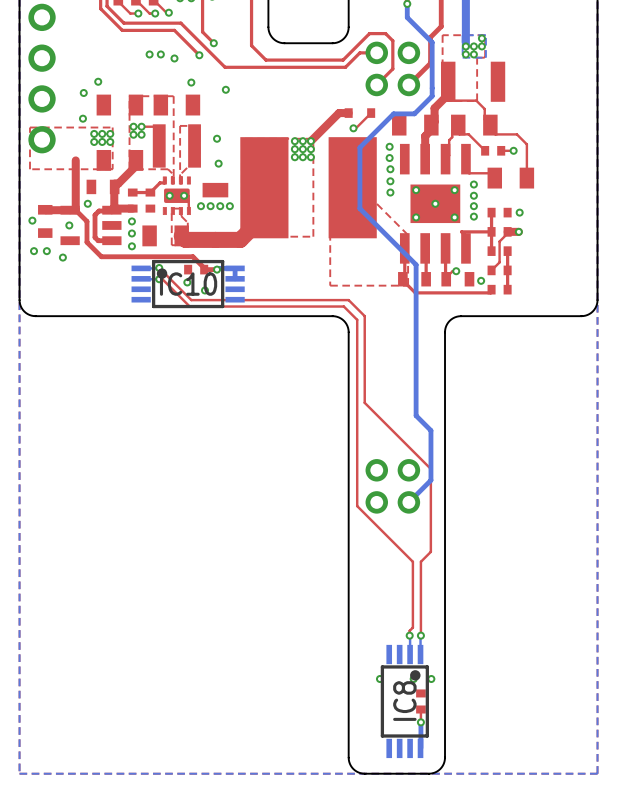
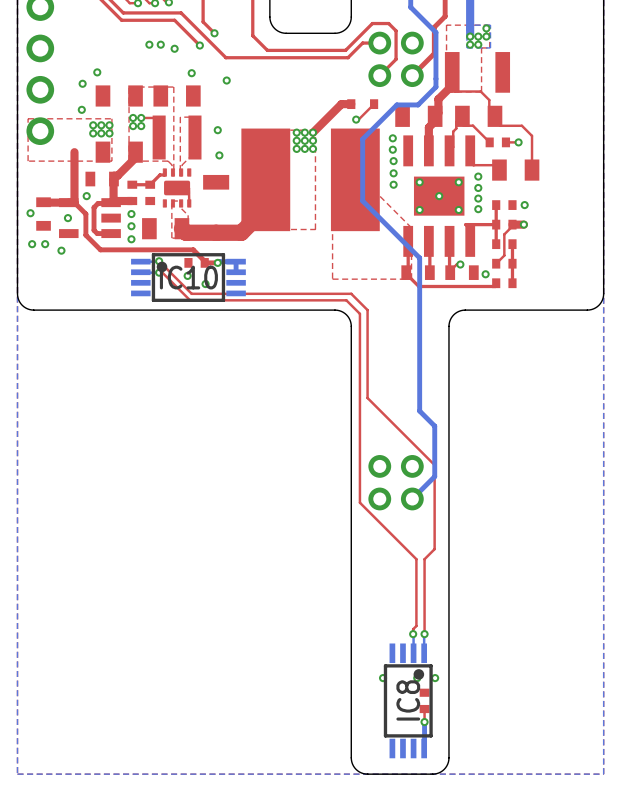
via: (169, 195) -> none
via: (184, 195) -> none
via: (200, 206) -> none
via: (210, 206) -> none
via: (220, 206) -> none
via: (229, 206) -> none

